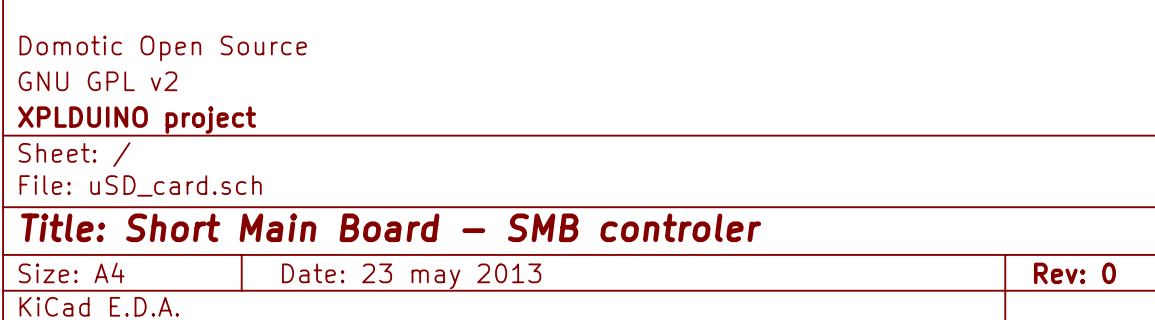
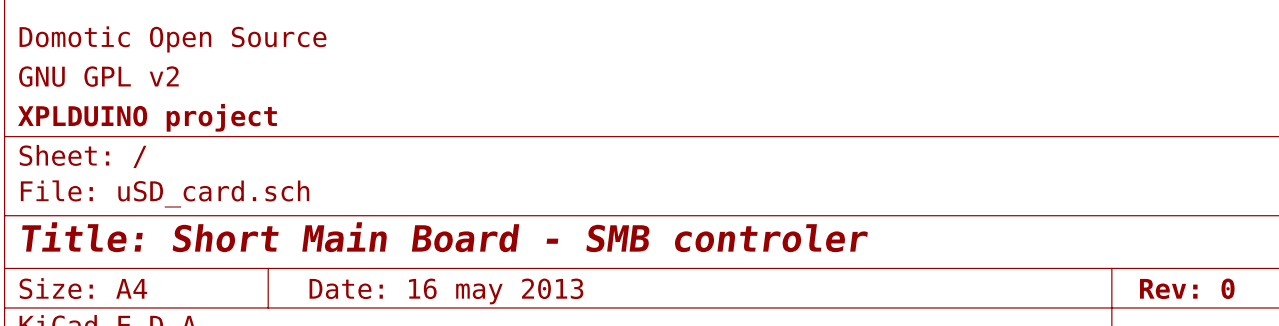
title block: Date: 23 may 2013 (411, 276) -> Date: 16 may 2013 (446, 291)

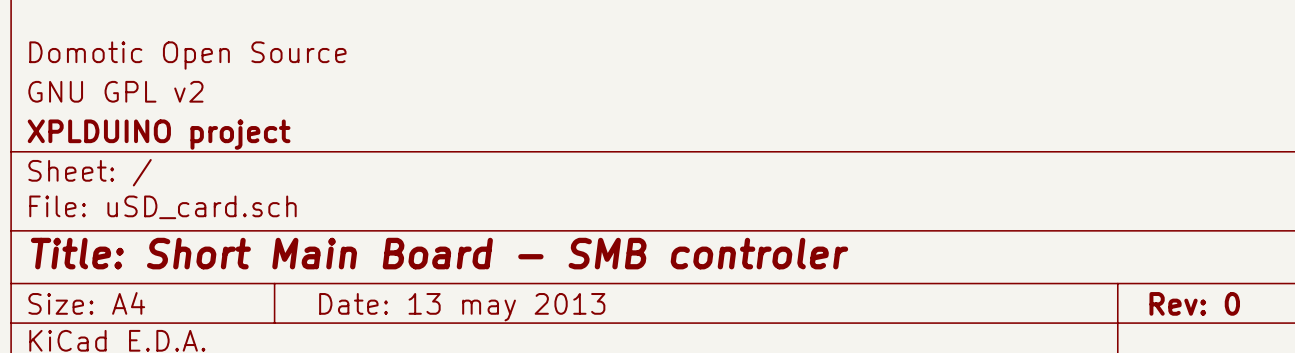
title block: Date: 16 may 2013 (446, 291) -> Date: 13 may 2013 (462, 307)

